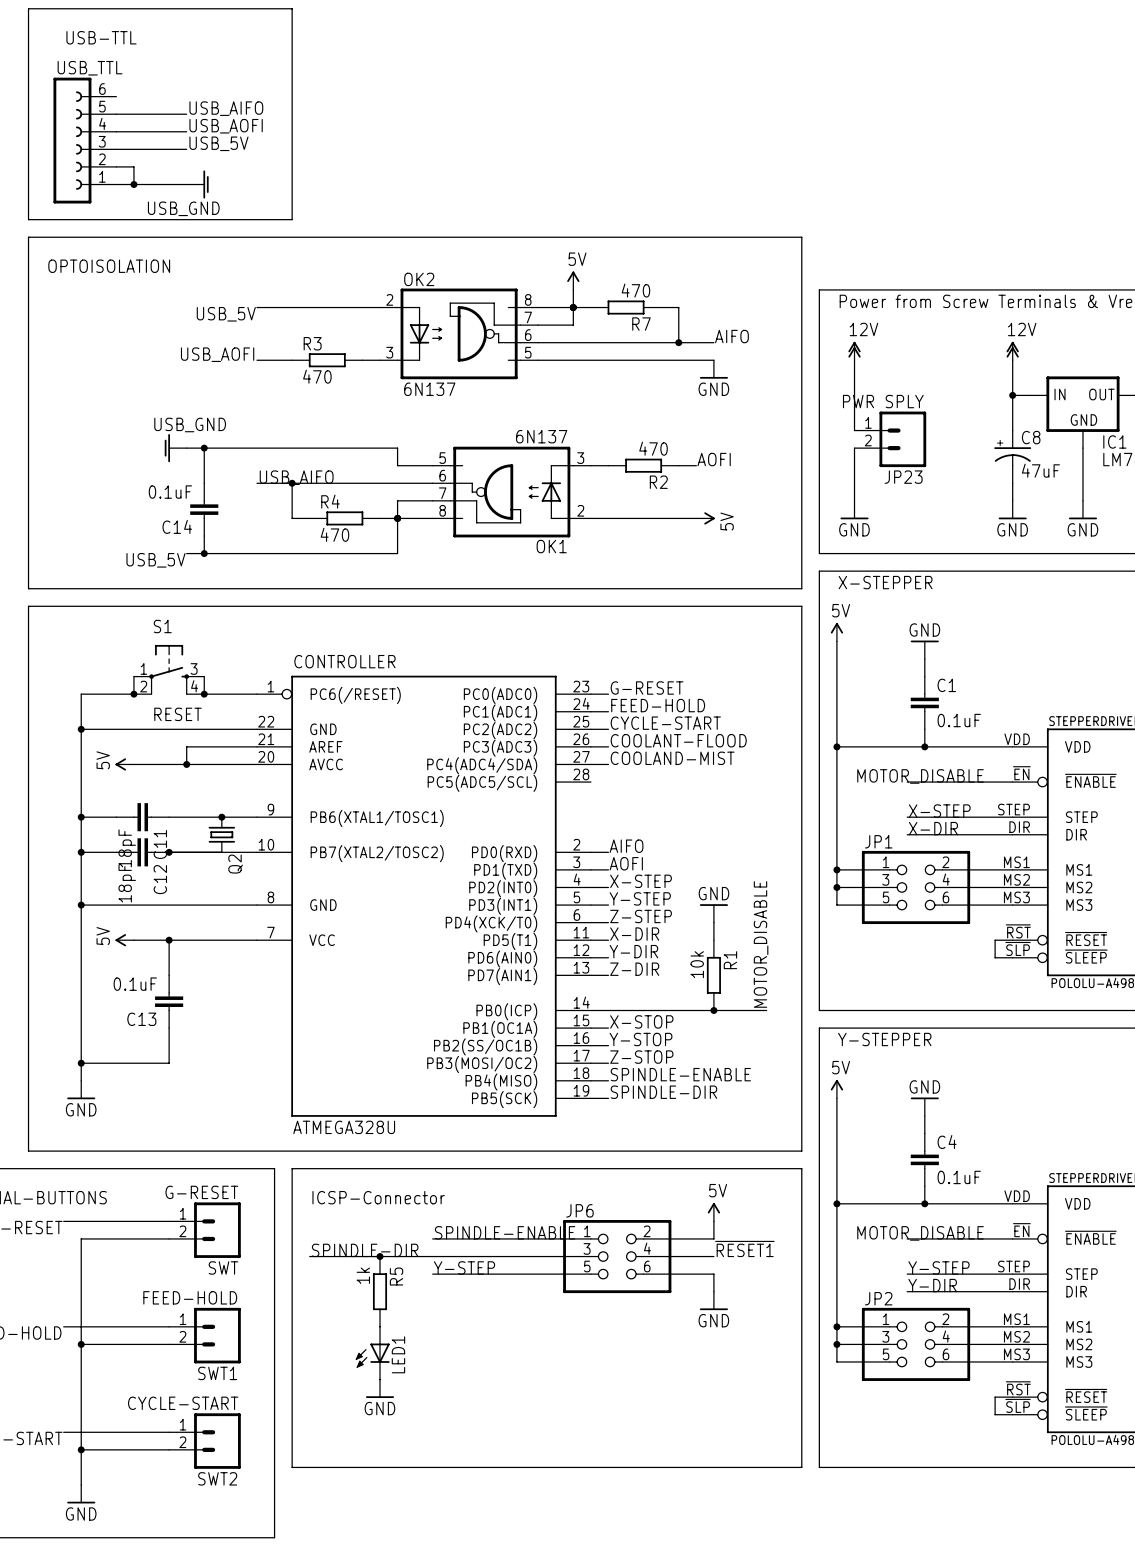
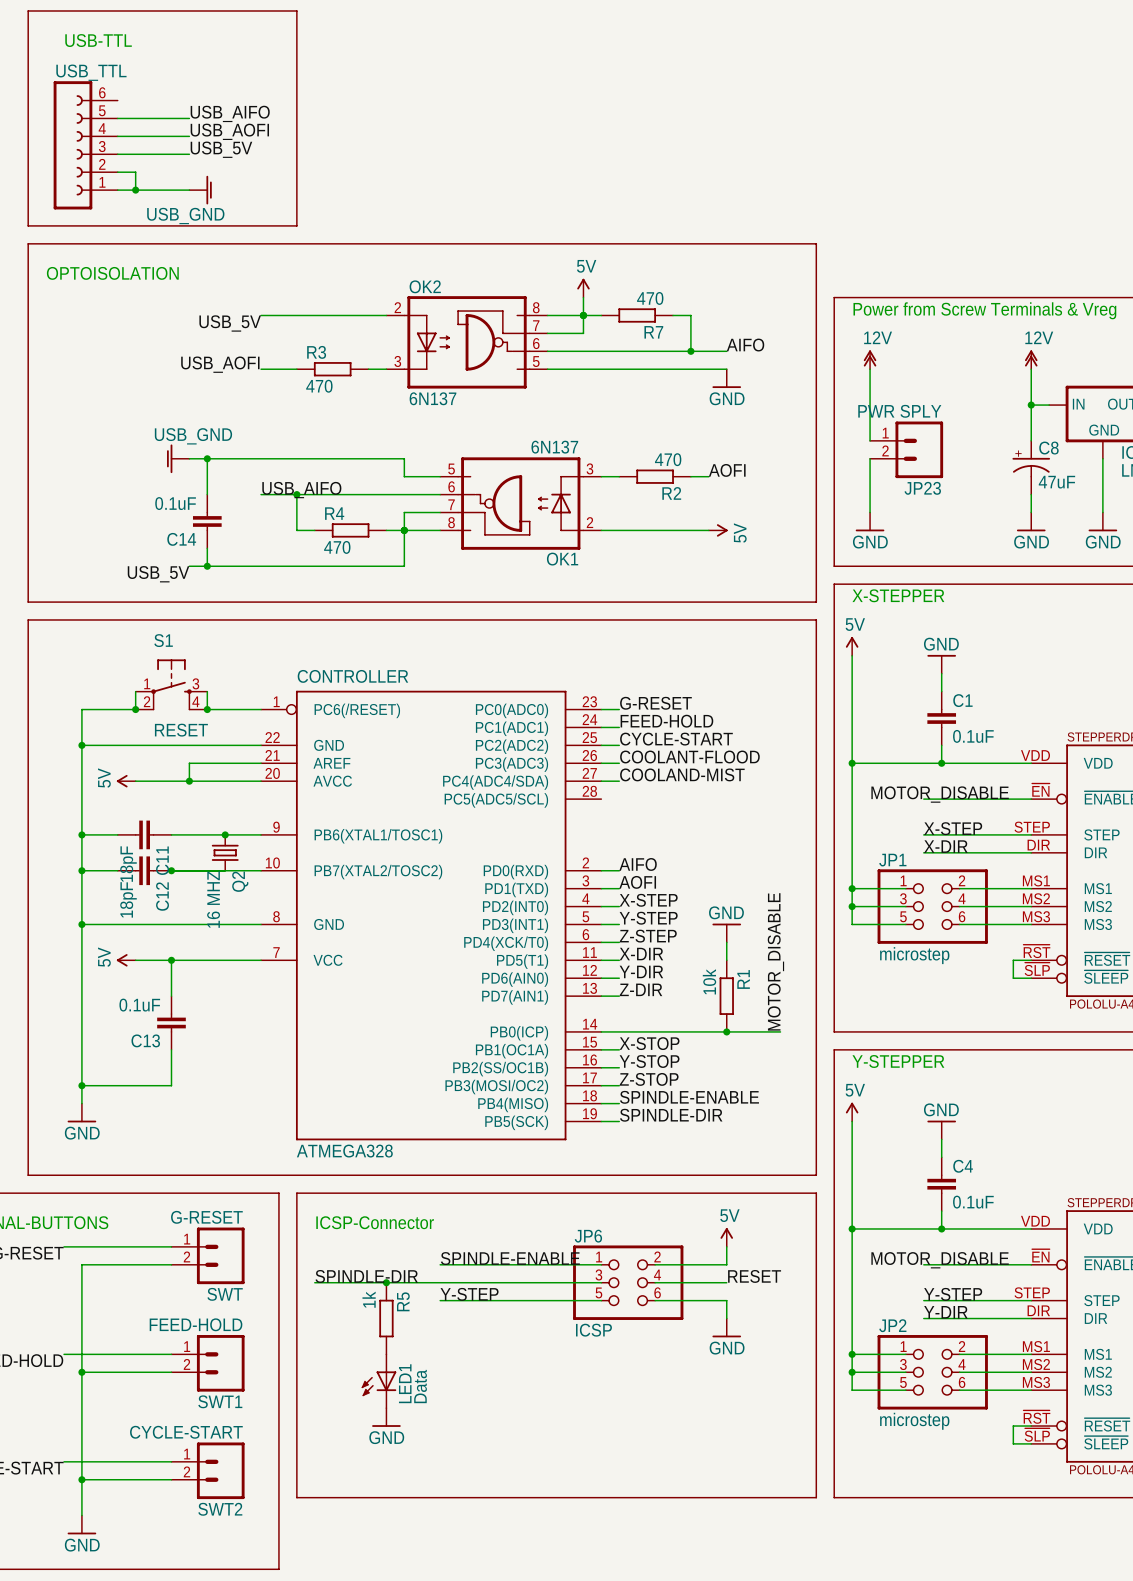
Q2 value: none -> 16 MHZ (213, 899)
JP1 value: none -> microstep (914, 955)
ATMEGA328U name: ATMEGA328U (344, 1127) -> ATMEGA328 (344, 1151)
label: ~{RESET1} (744, 1248) -> RESET (754, 1276)
JP6 value: none -> ICSP (593, 1330)
LED1 value: none -> Data (420, 1386)
JP2 value: none -> microstep (914, 1421)

